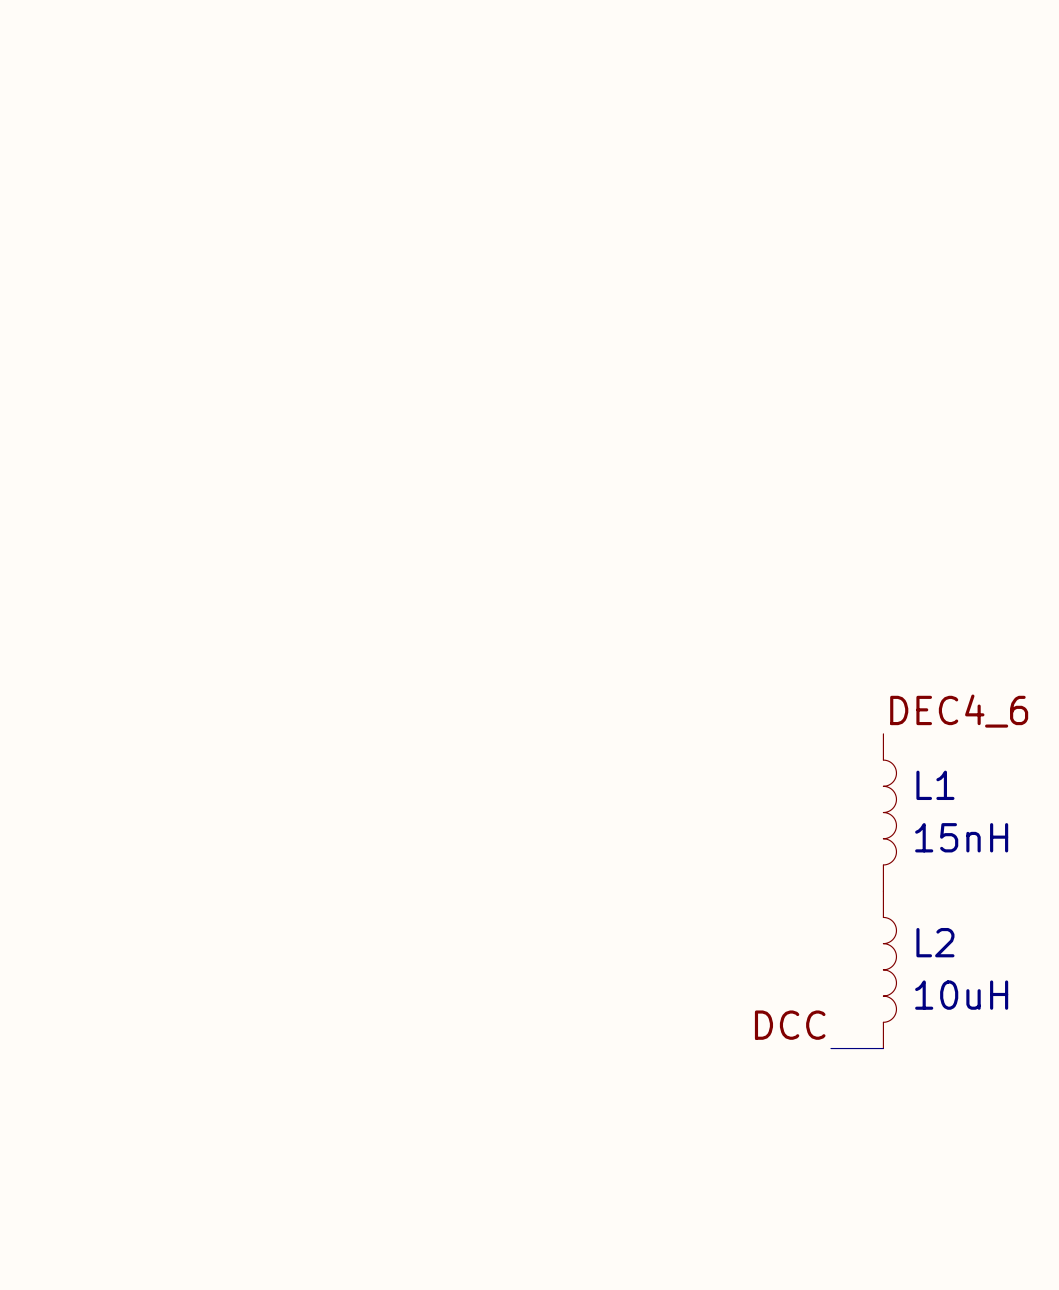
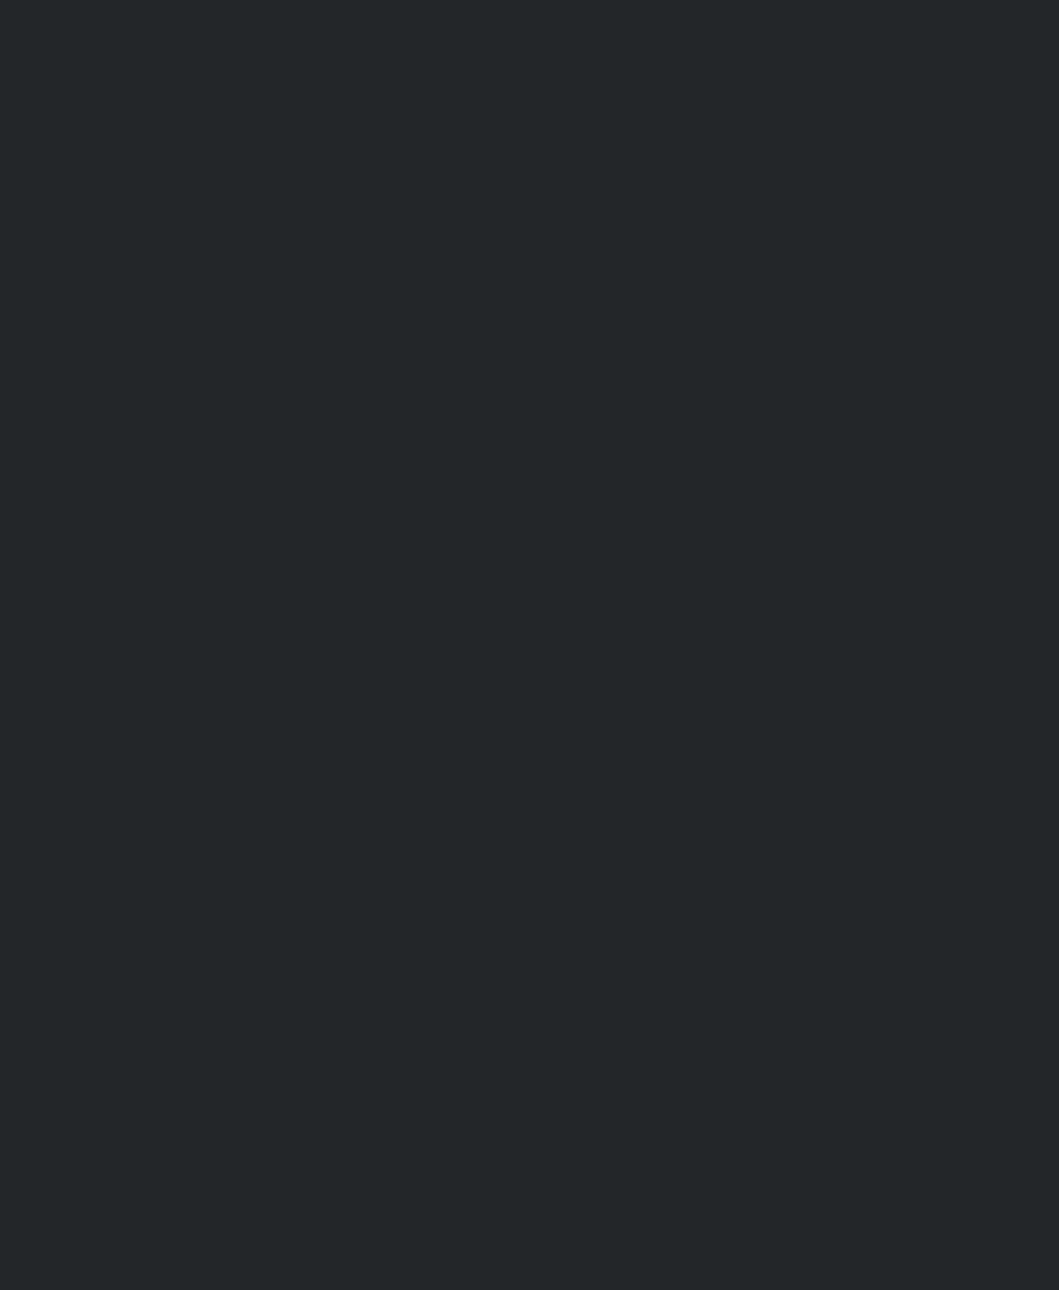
label: DEC4_6 (959, 711) -> none
L1: 15nH (889, 812) -> none
L2: 10uH (889, 969) -> none
label: DCC (790, 1025) -> none
wire: (830, 1048) (883, 1048) -> none

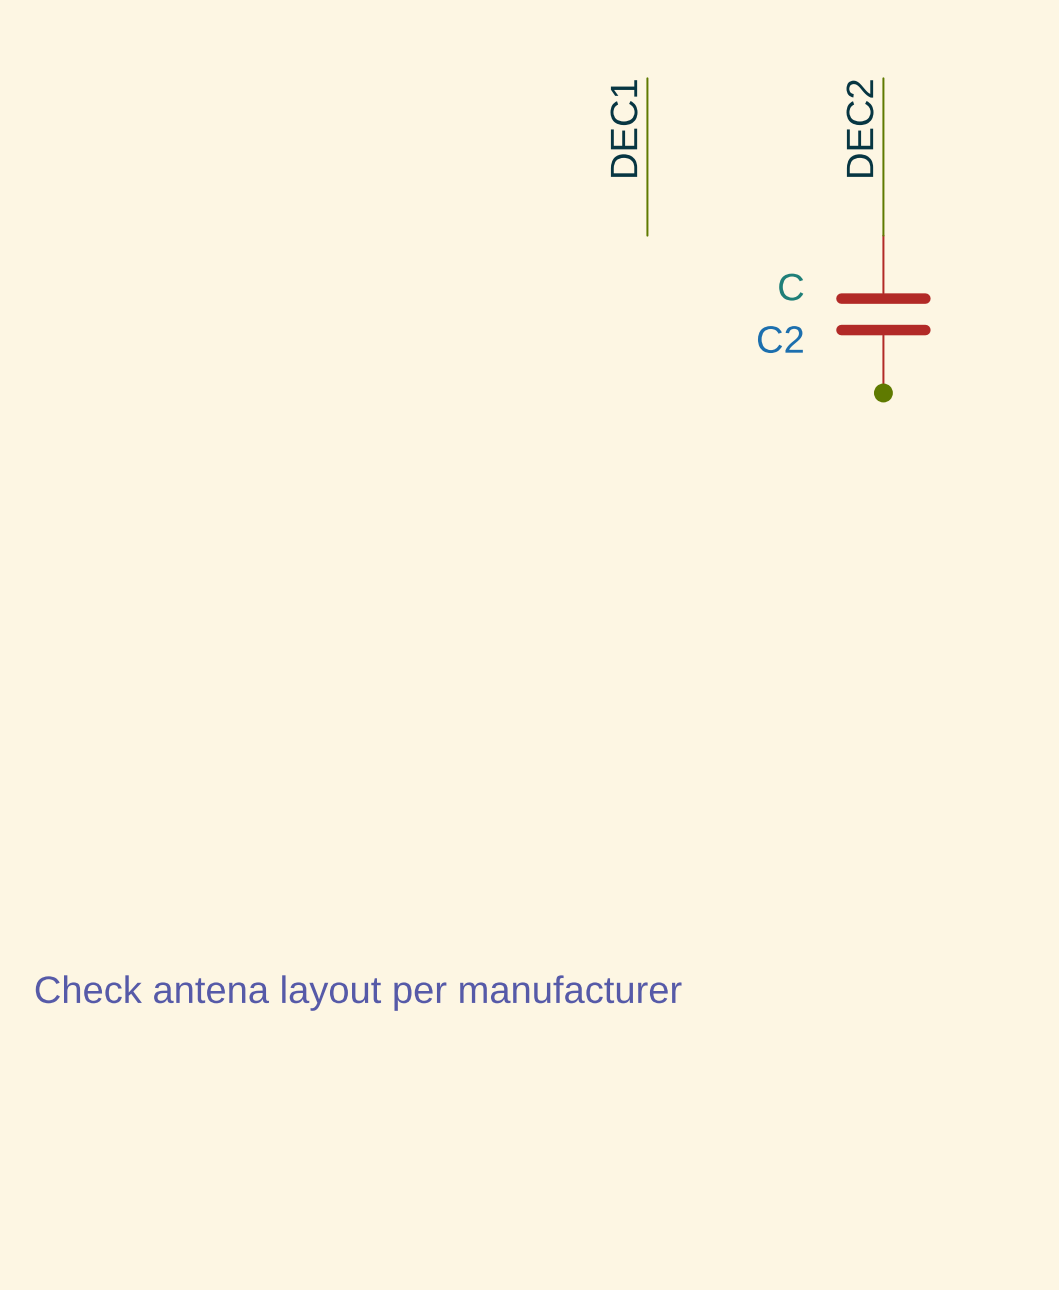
wire: none -> (647, 78) (647, 235)
wire: none -> (883, 78) (883, 235)
label: none -> DEC1 (624, 128)
label: none -> DEC2 (860, 128)
C2: none -> C (883, 314)
junction: none -> (883, 392)
text: none -> Check antena layout per manufacturer (358, 993)

